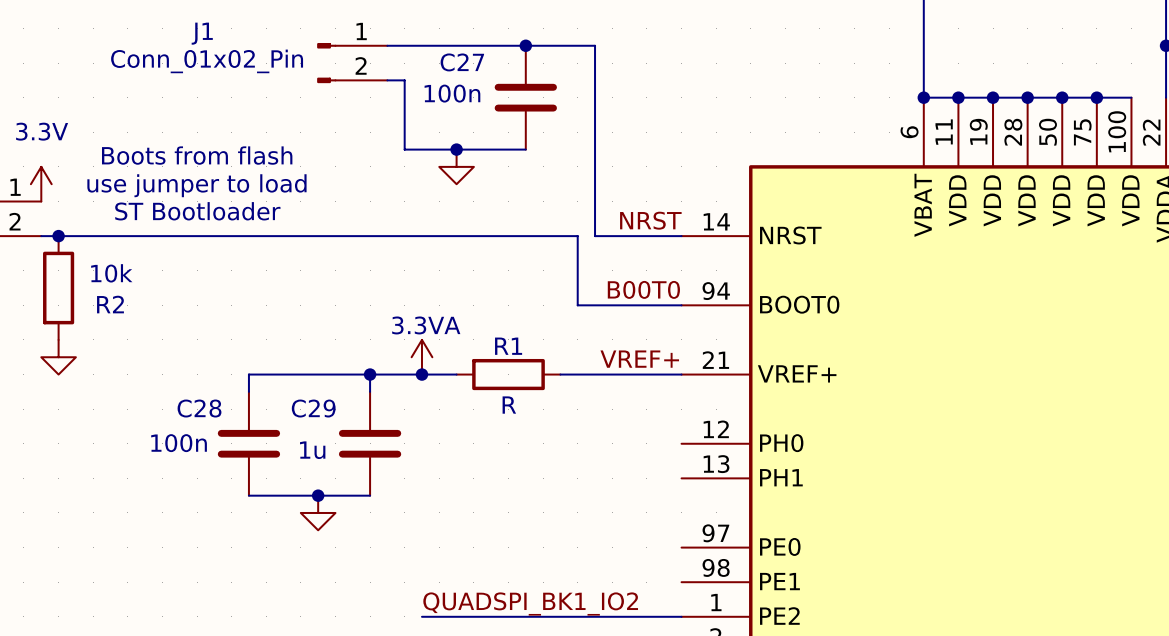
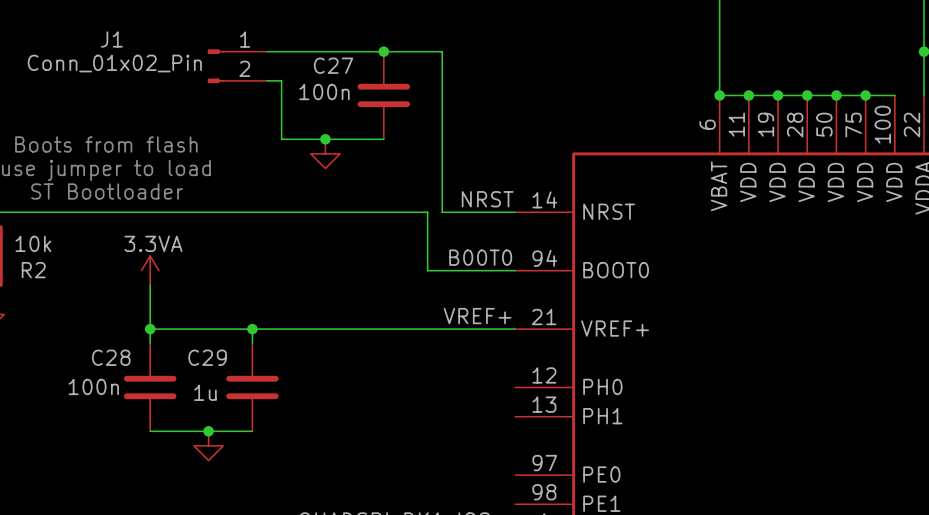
wire: none -> (150, 285) (150, 329)
power symbol position: 3.3VA (421, 357) -> 3.3VA (150, 270)
junction: none -> (150, 329)
junction: (421, 374) -> none
wire: none -> (325, 329) (413, 329)
R1: R (508, 374) -> none

